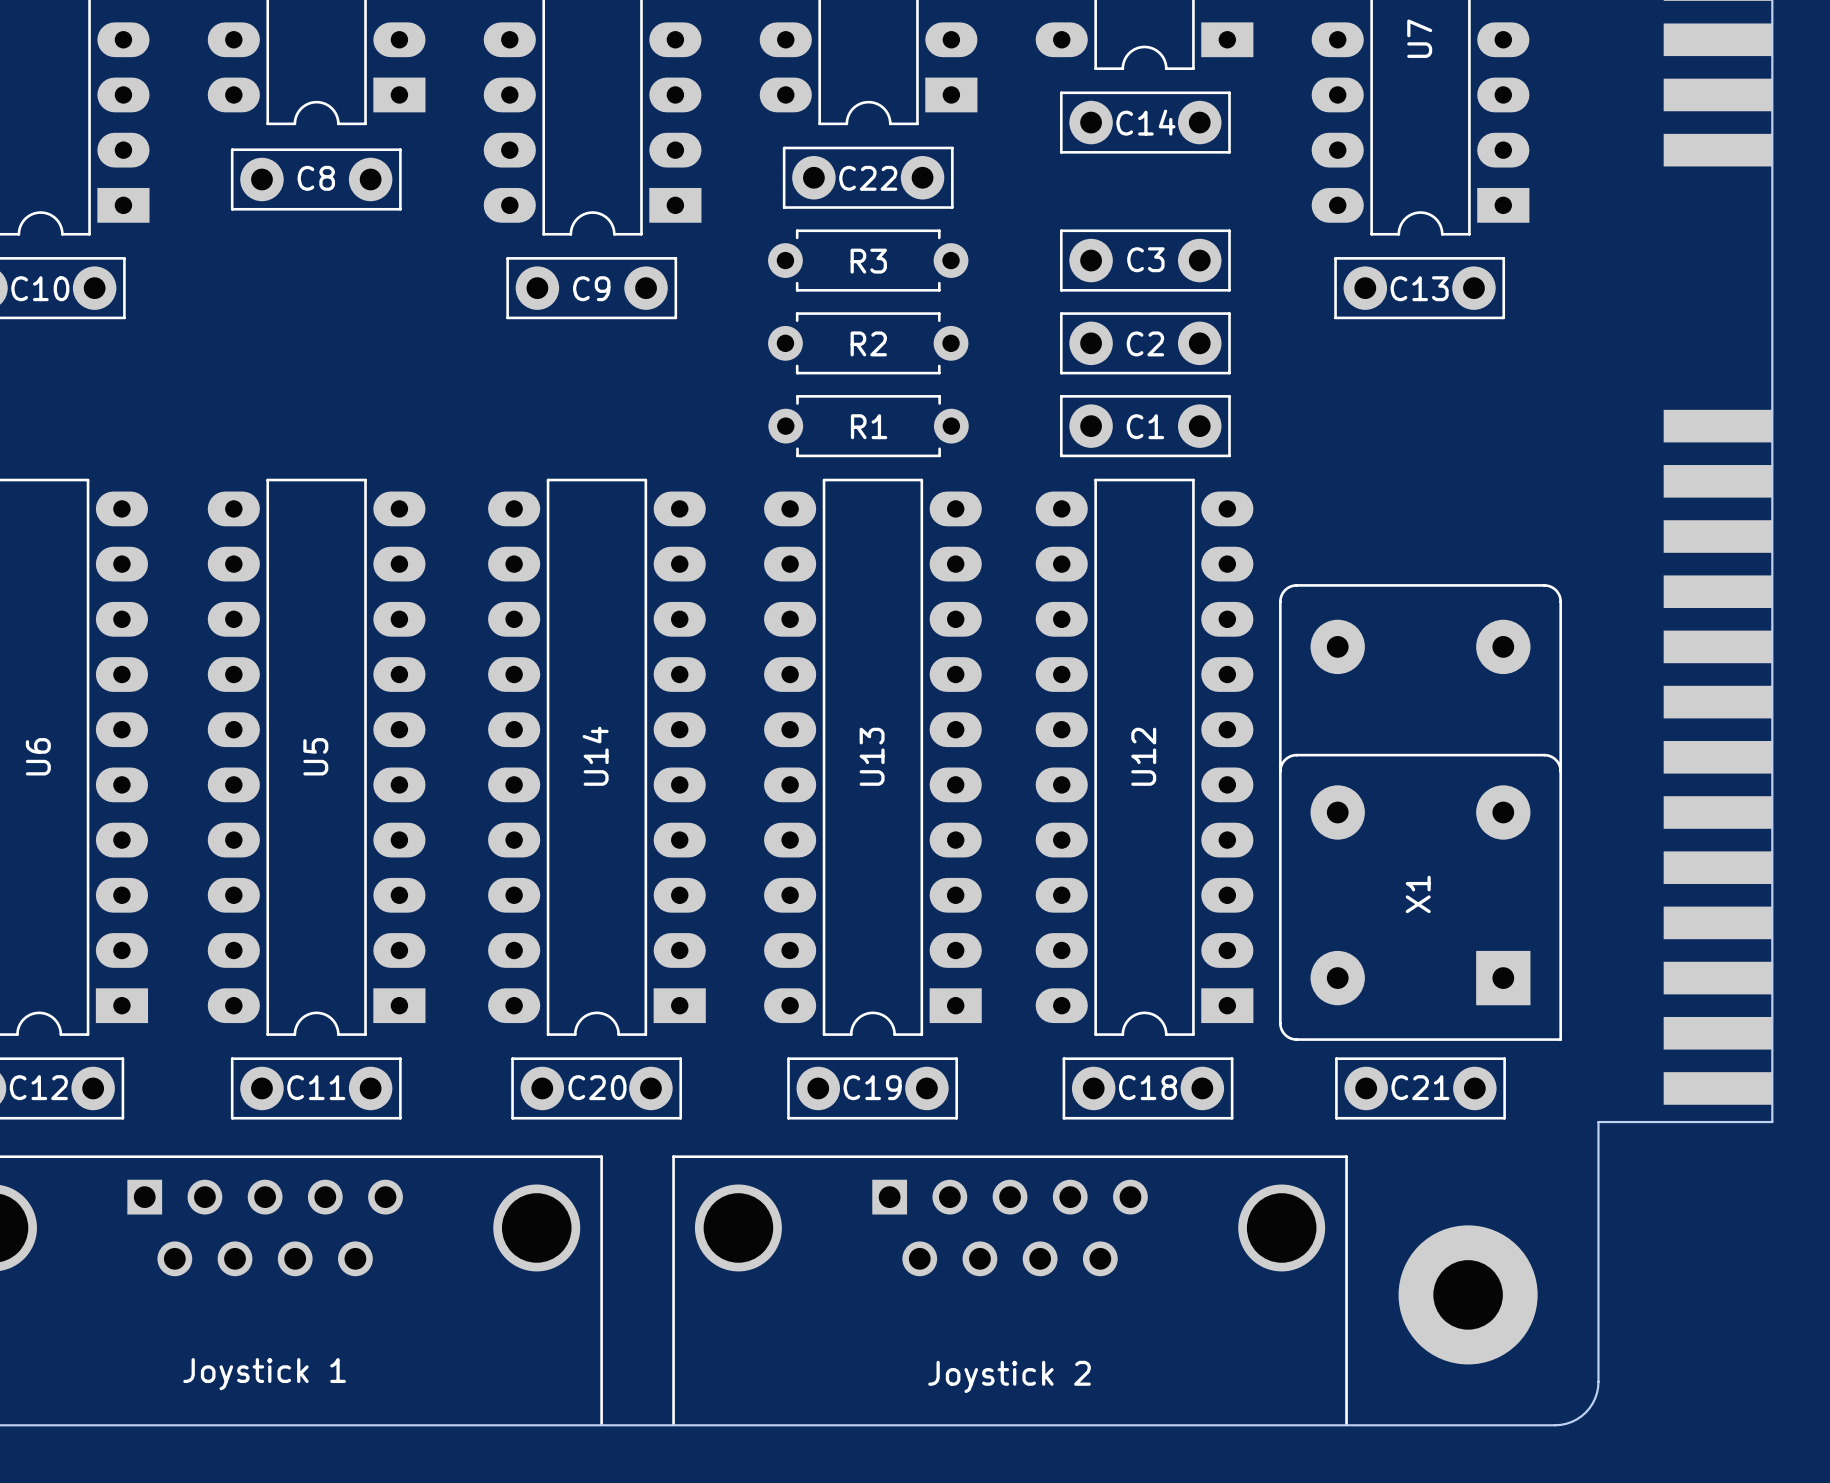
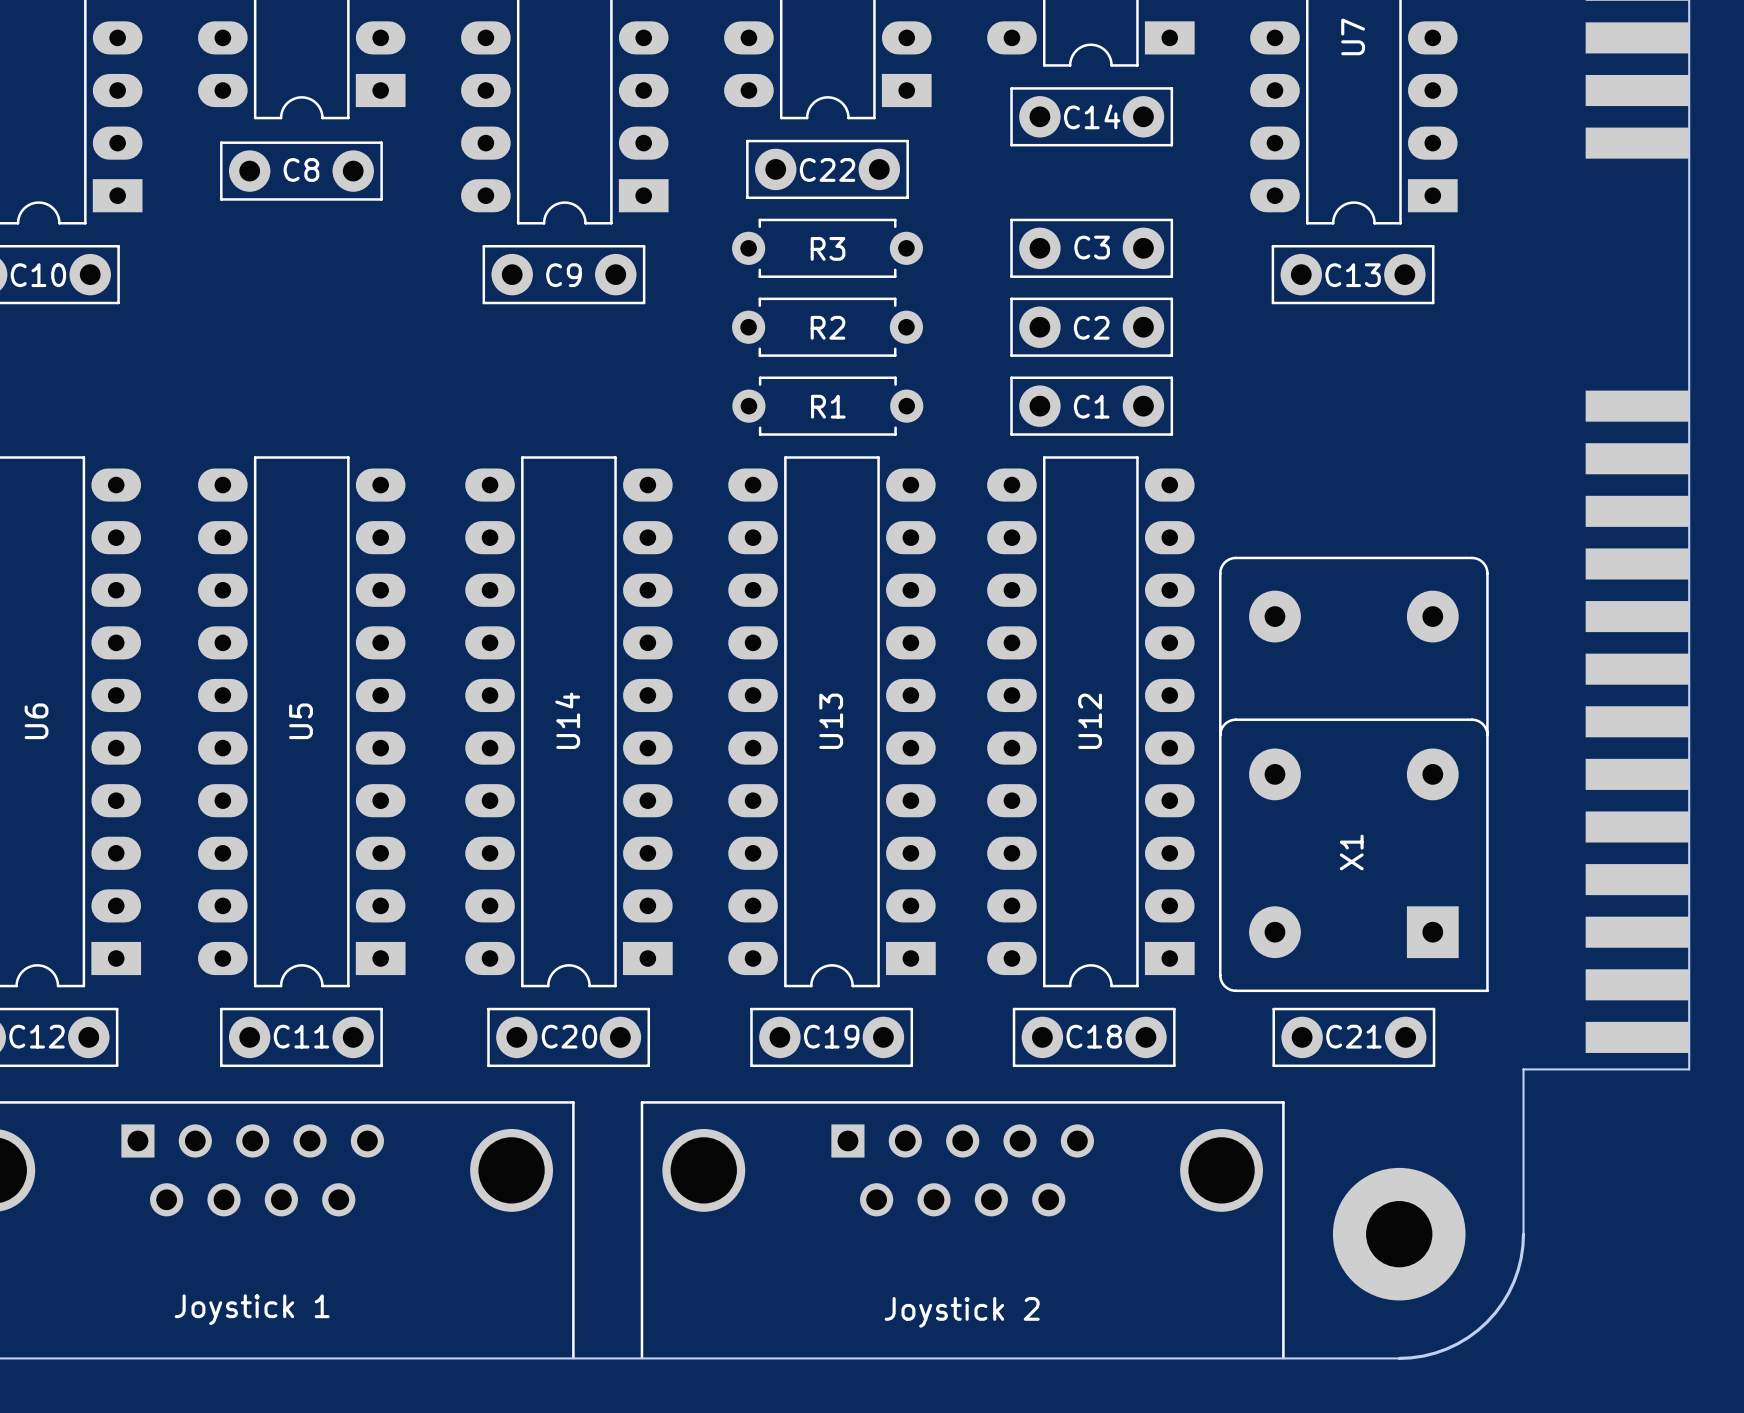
board edge: (1598, 1294) (1598, 1387) (1595, 1398) (1585, 1412) (1576, 1419) (1560, 1424) (1468, 1425) -> (1523, 1234) (1521, 1258) (1514, 1281) (1502, 1303) (1487, 1322) (1468, 1337) (1446, 1348) (1423, 1356) (1399, 1358)

